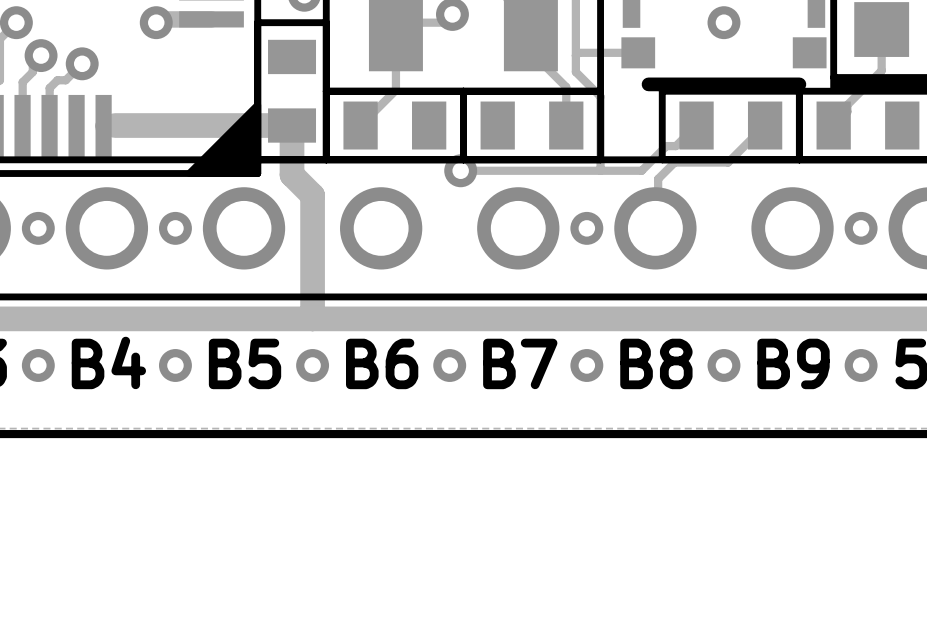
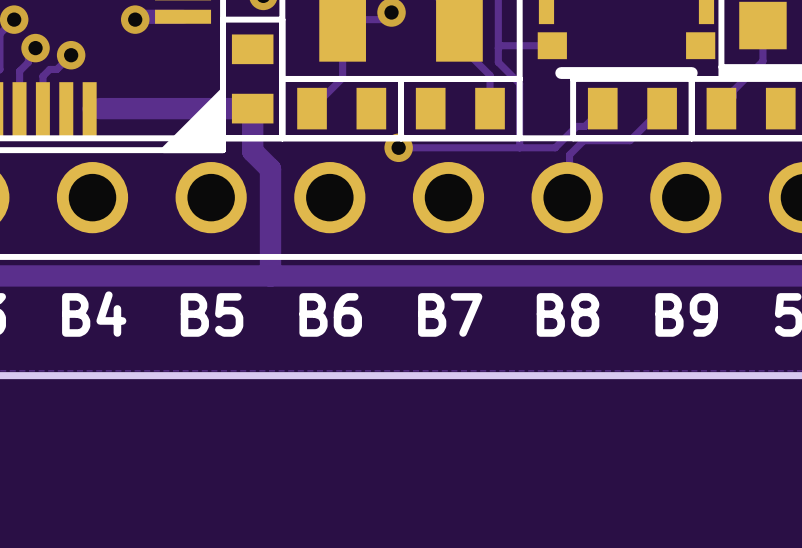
part: (723, 22) -> none
part: (38, 228) -> none
part: (175, 228) -> none
part: (586, 228) -> none
part: (861, 228) -> none
part: (38, 365) -> none
part: (175, 365) -> none
part: (312, 365) -> none
part: (449, 365) -> none
part: (586, 365) -> none
part: (723, 365) -> none
part: (861, 365) -> none

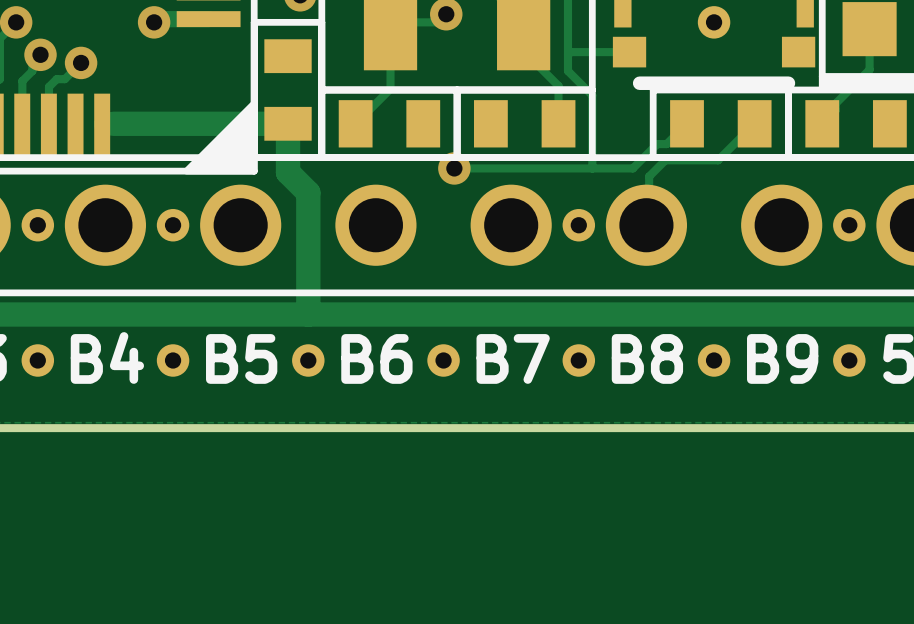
part: none -> (714, 22)
part: none -> (37, 225)
part: none -> (173, 225)
part: none -> (578, 225)
part: none -> (849, 225)
part: none -> (37, 360)
part: none -> (173, 360)
part: none -> (308, 360)
part: none -> (443, 360)
part: none -> (578, 360)
part: none -> (714, 360)
part: none -> (849, 360)

